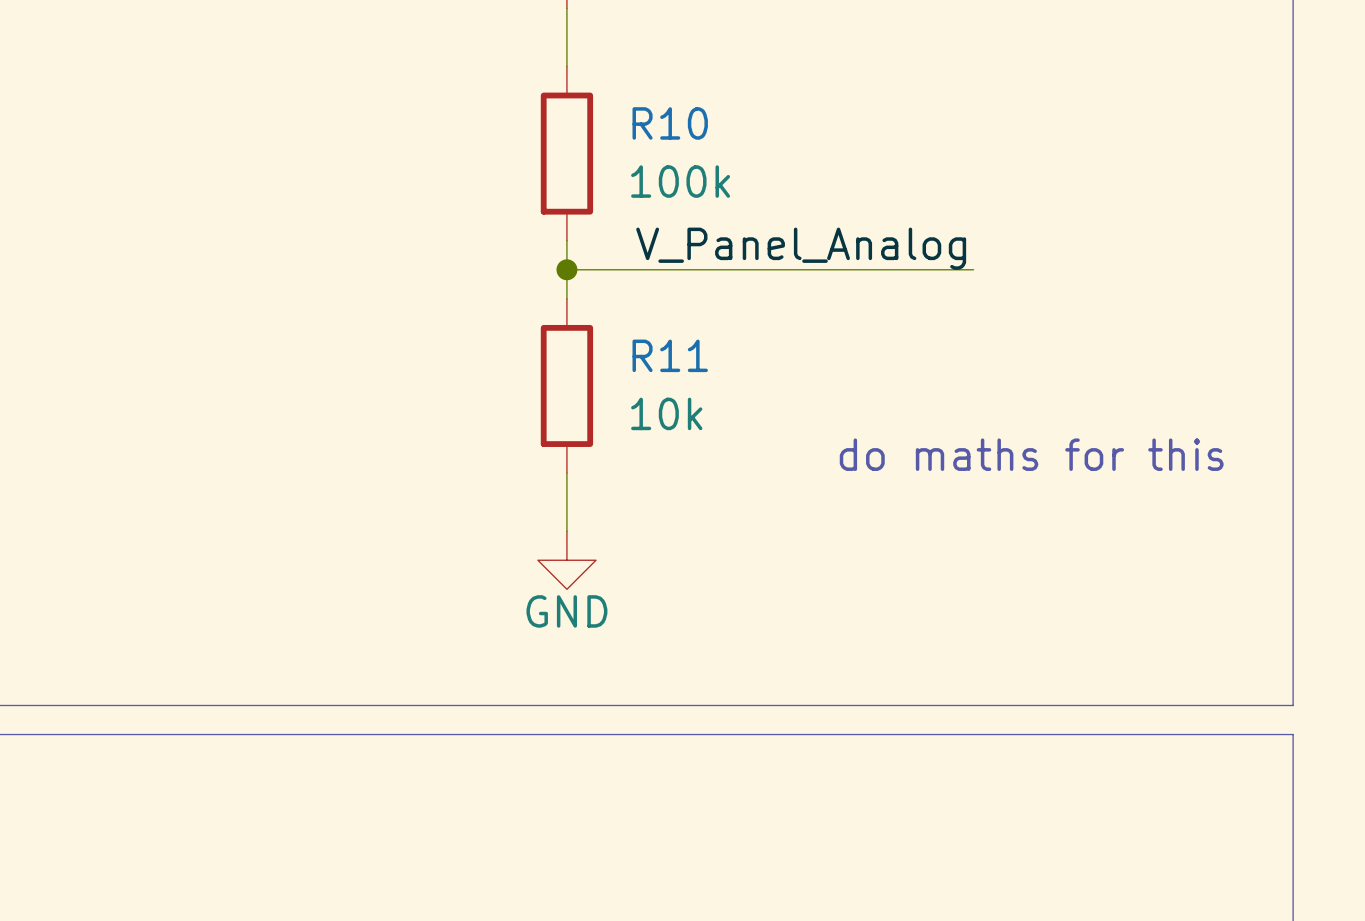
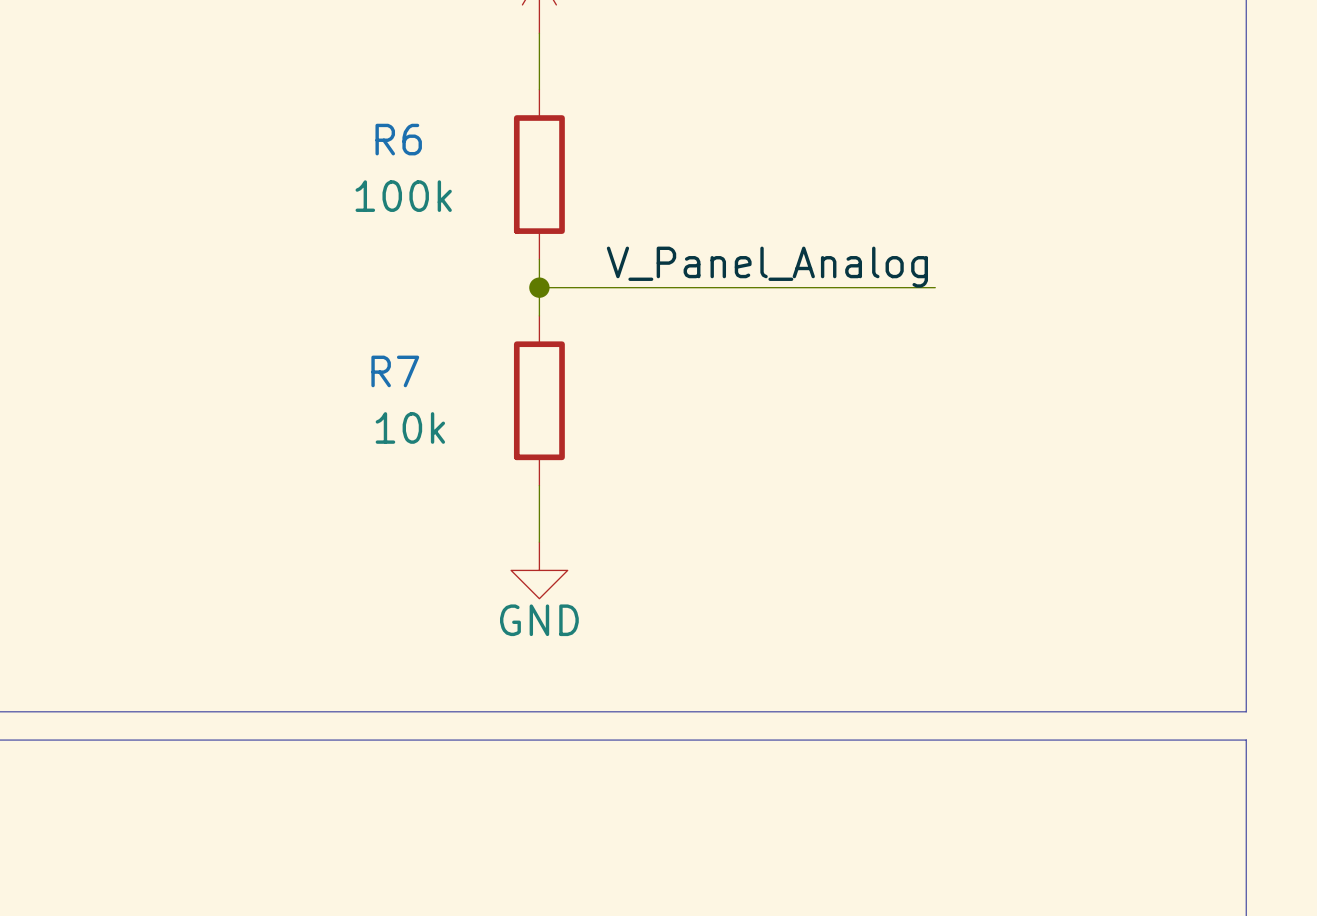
R10 name: R10 (670, 123) -> R6 (398, 139)
R10 value position: 100k (680, 181) -> 100k (403, 196)
R11 name: R11 (670, 355) -> R7 (395, 371)
R11 value position: 10k (666, 413) -> 10k (410, 427)
text: do maths for this (1031, 454) -> none

